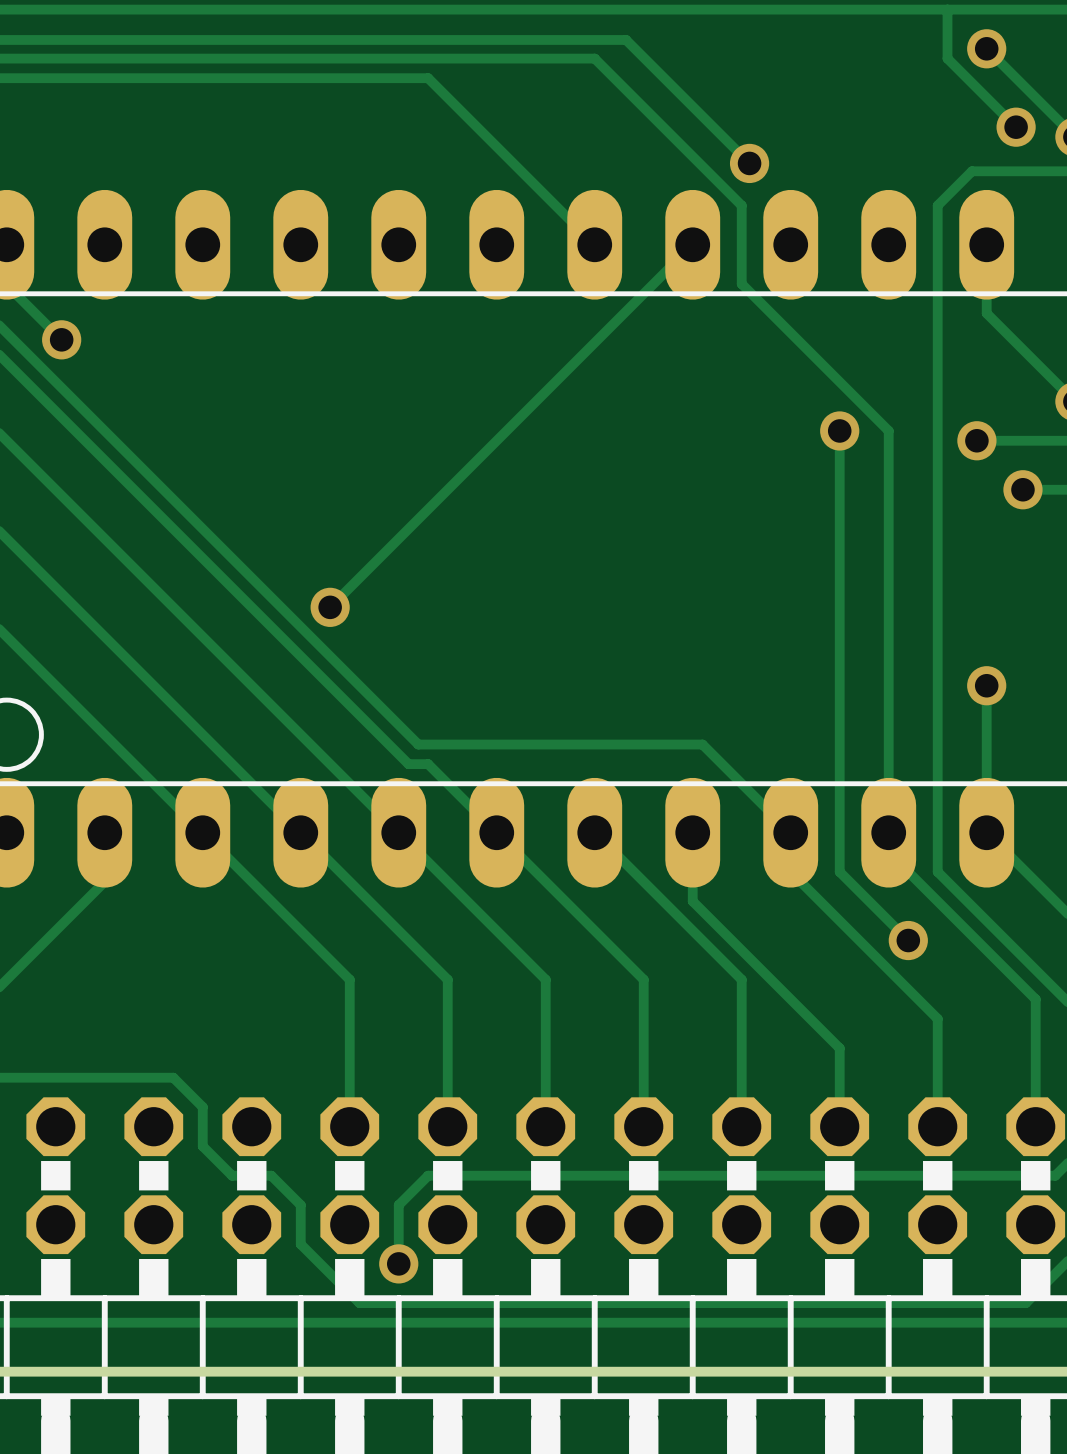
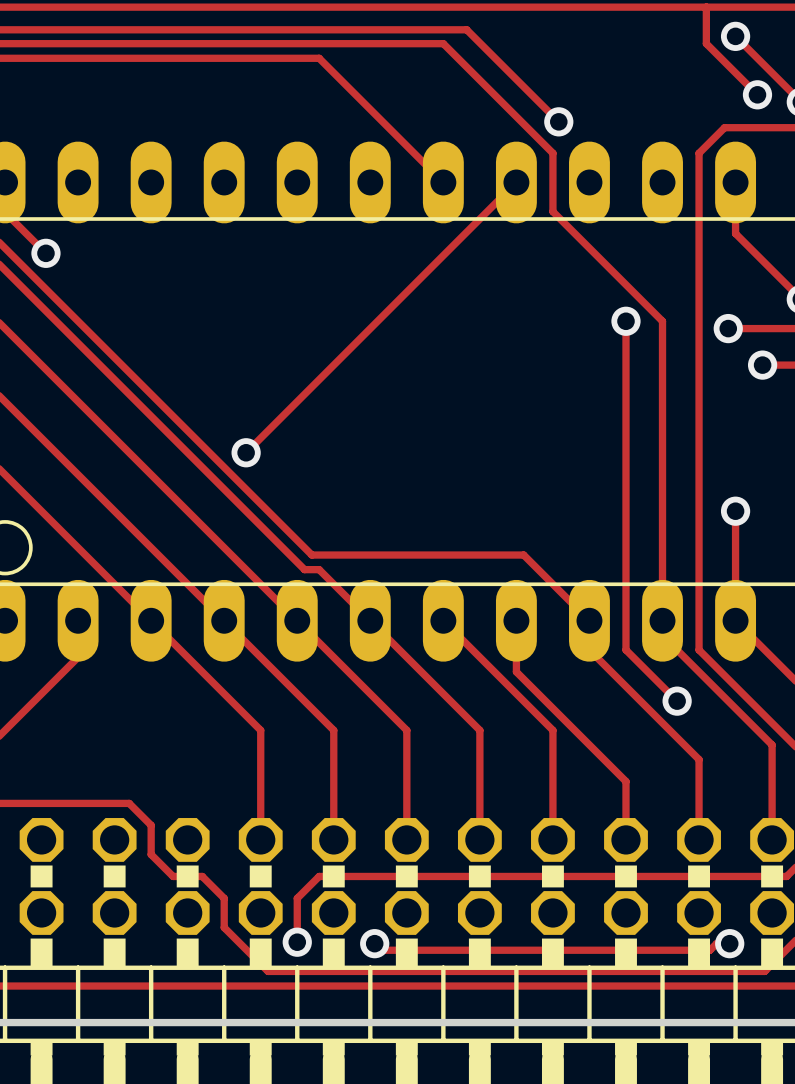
track: none -> (374, 943) (381, 950) (710, 950) (716, 943) (729, 943)
via: none -> (374, 943)
via: none -> (729, 943)

